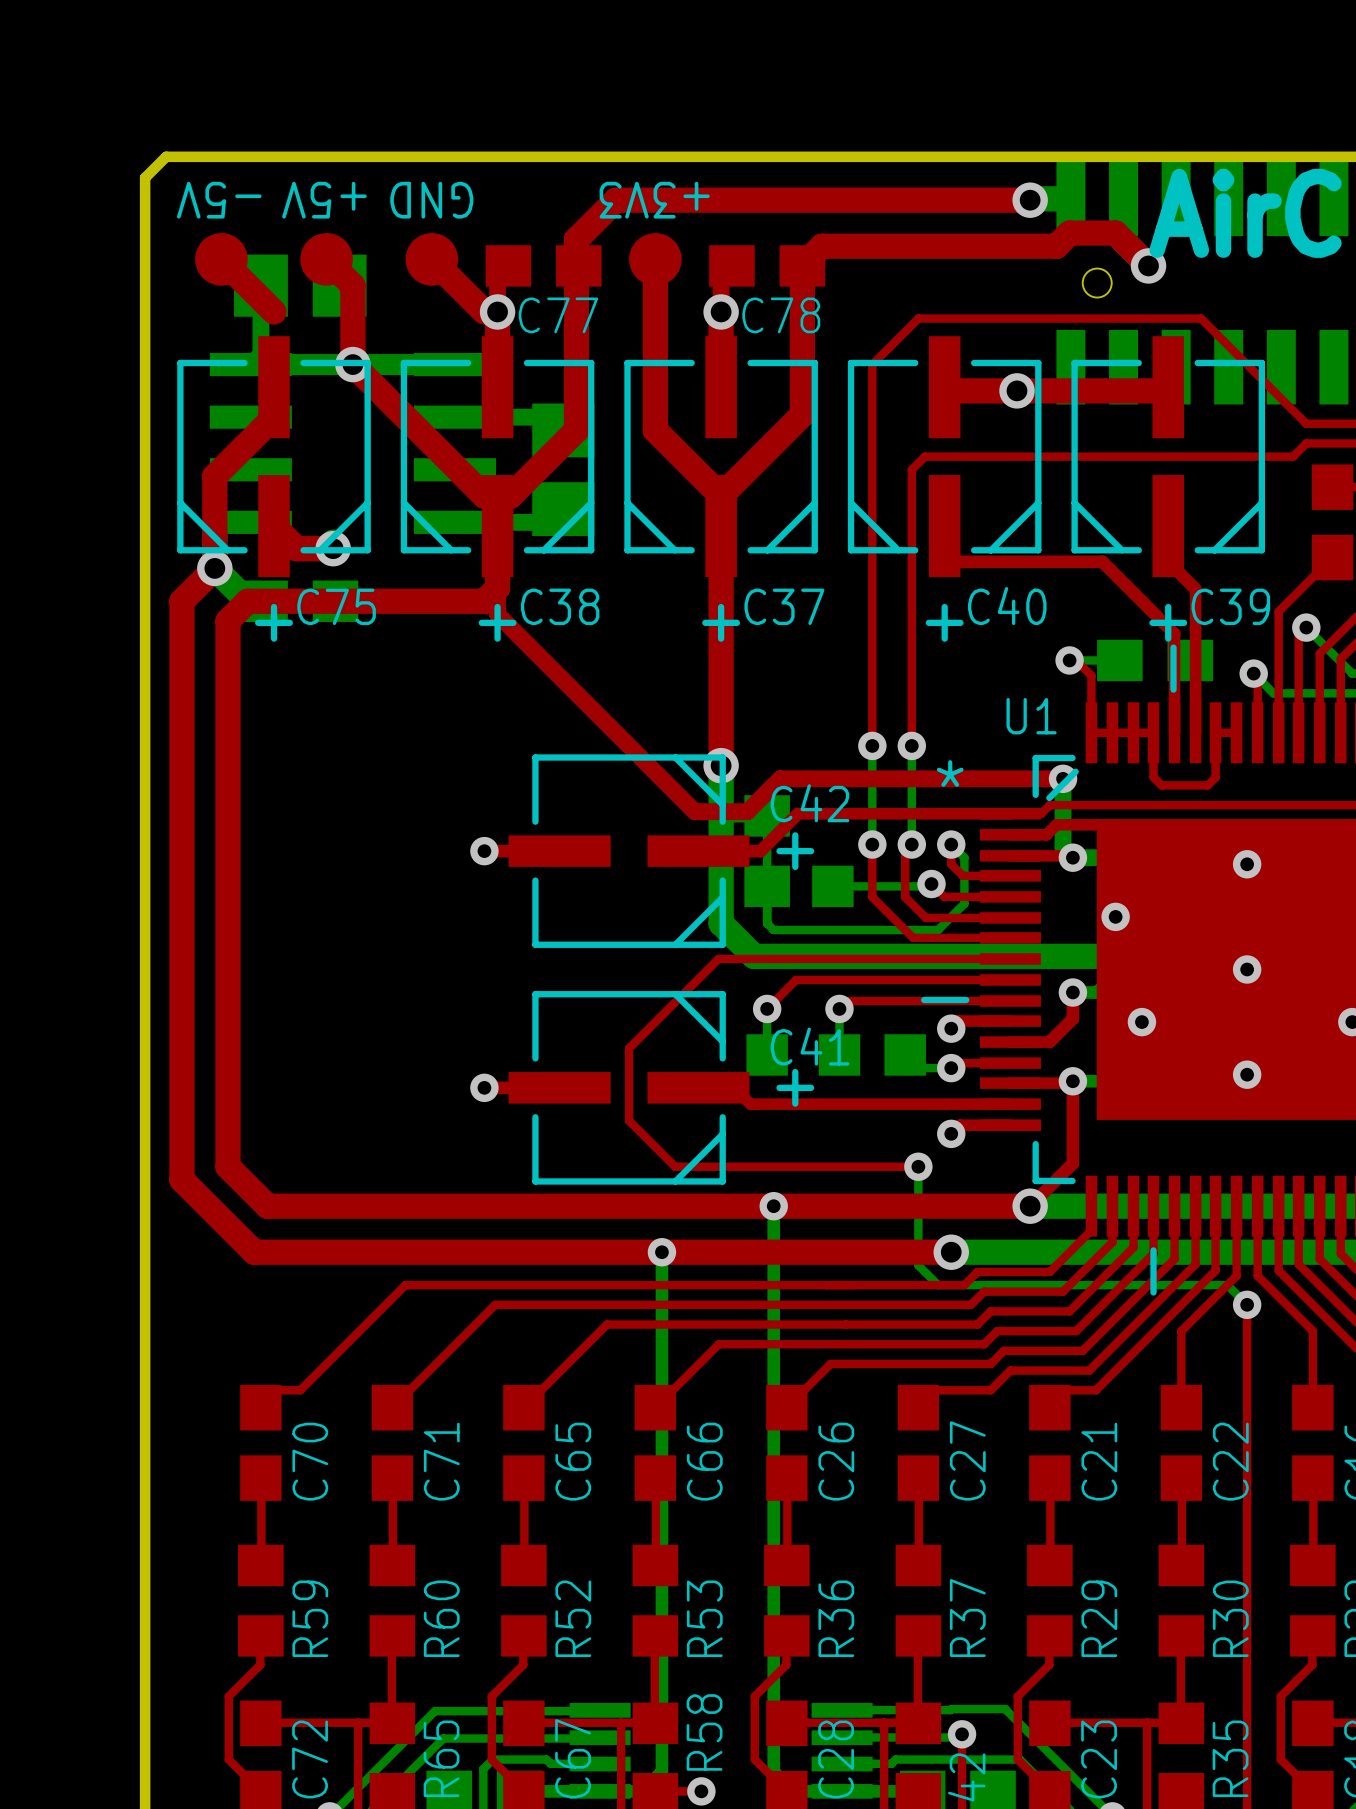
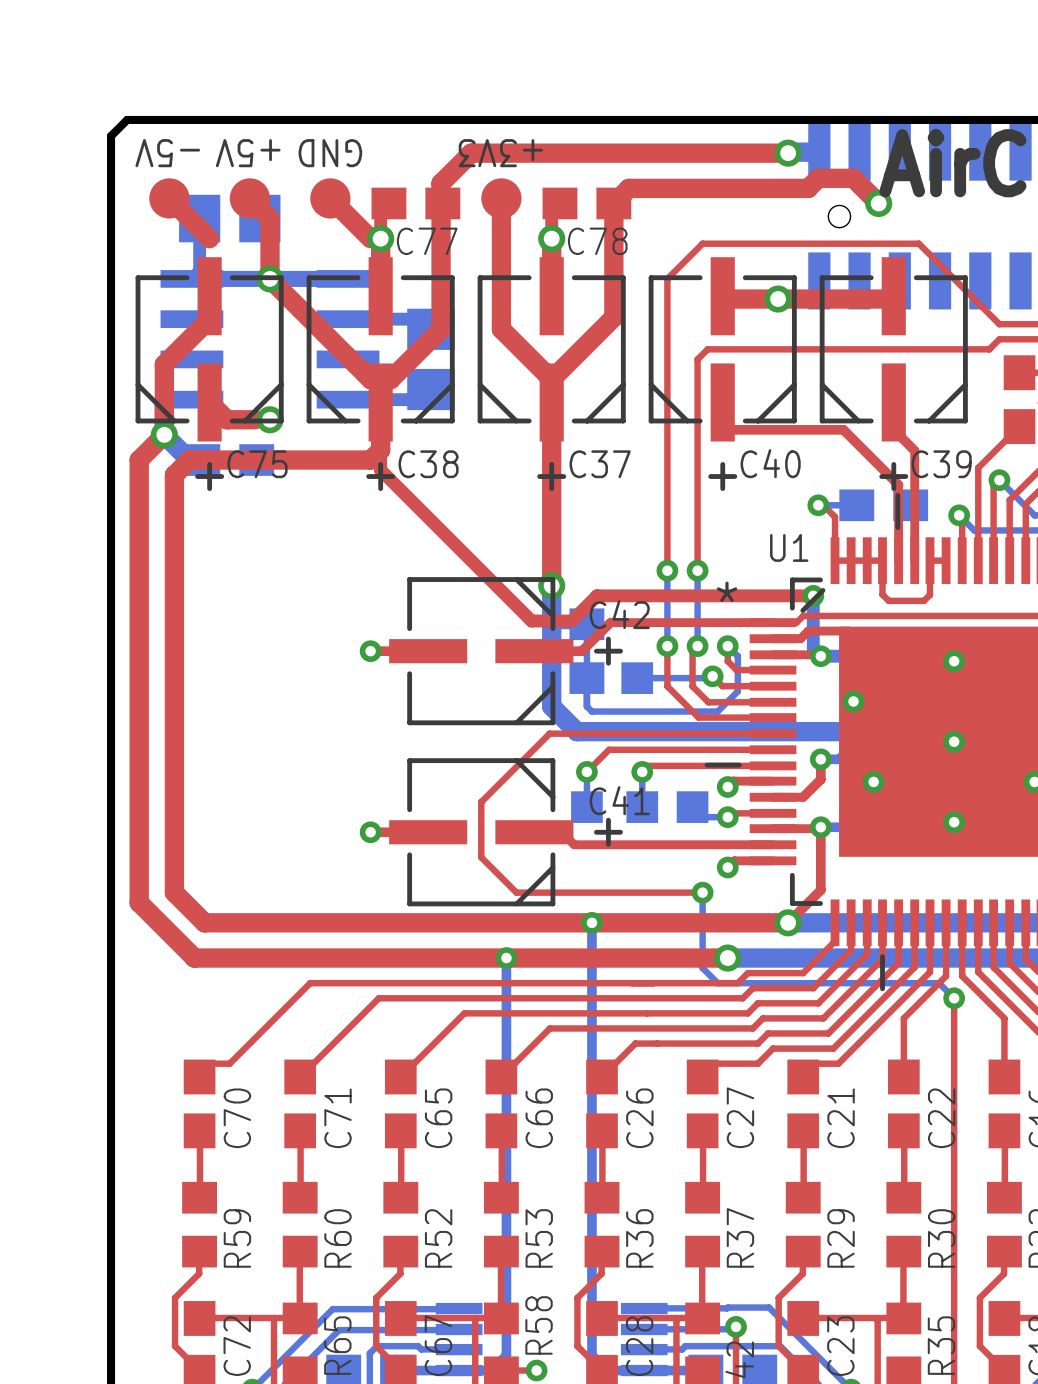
via position: (333, 548) -> (270, 419)

